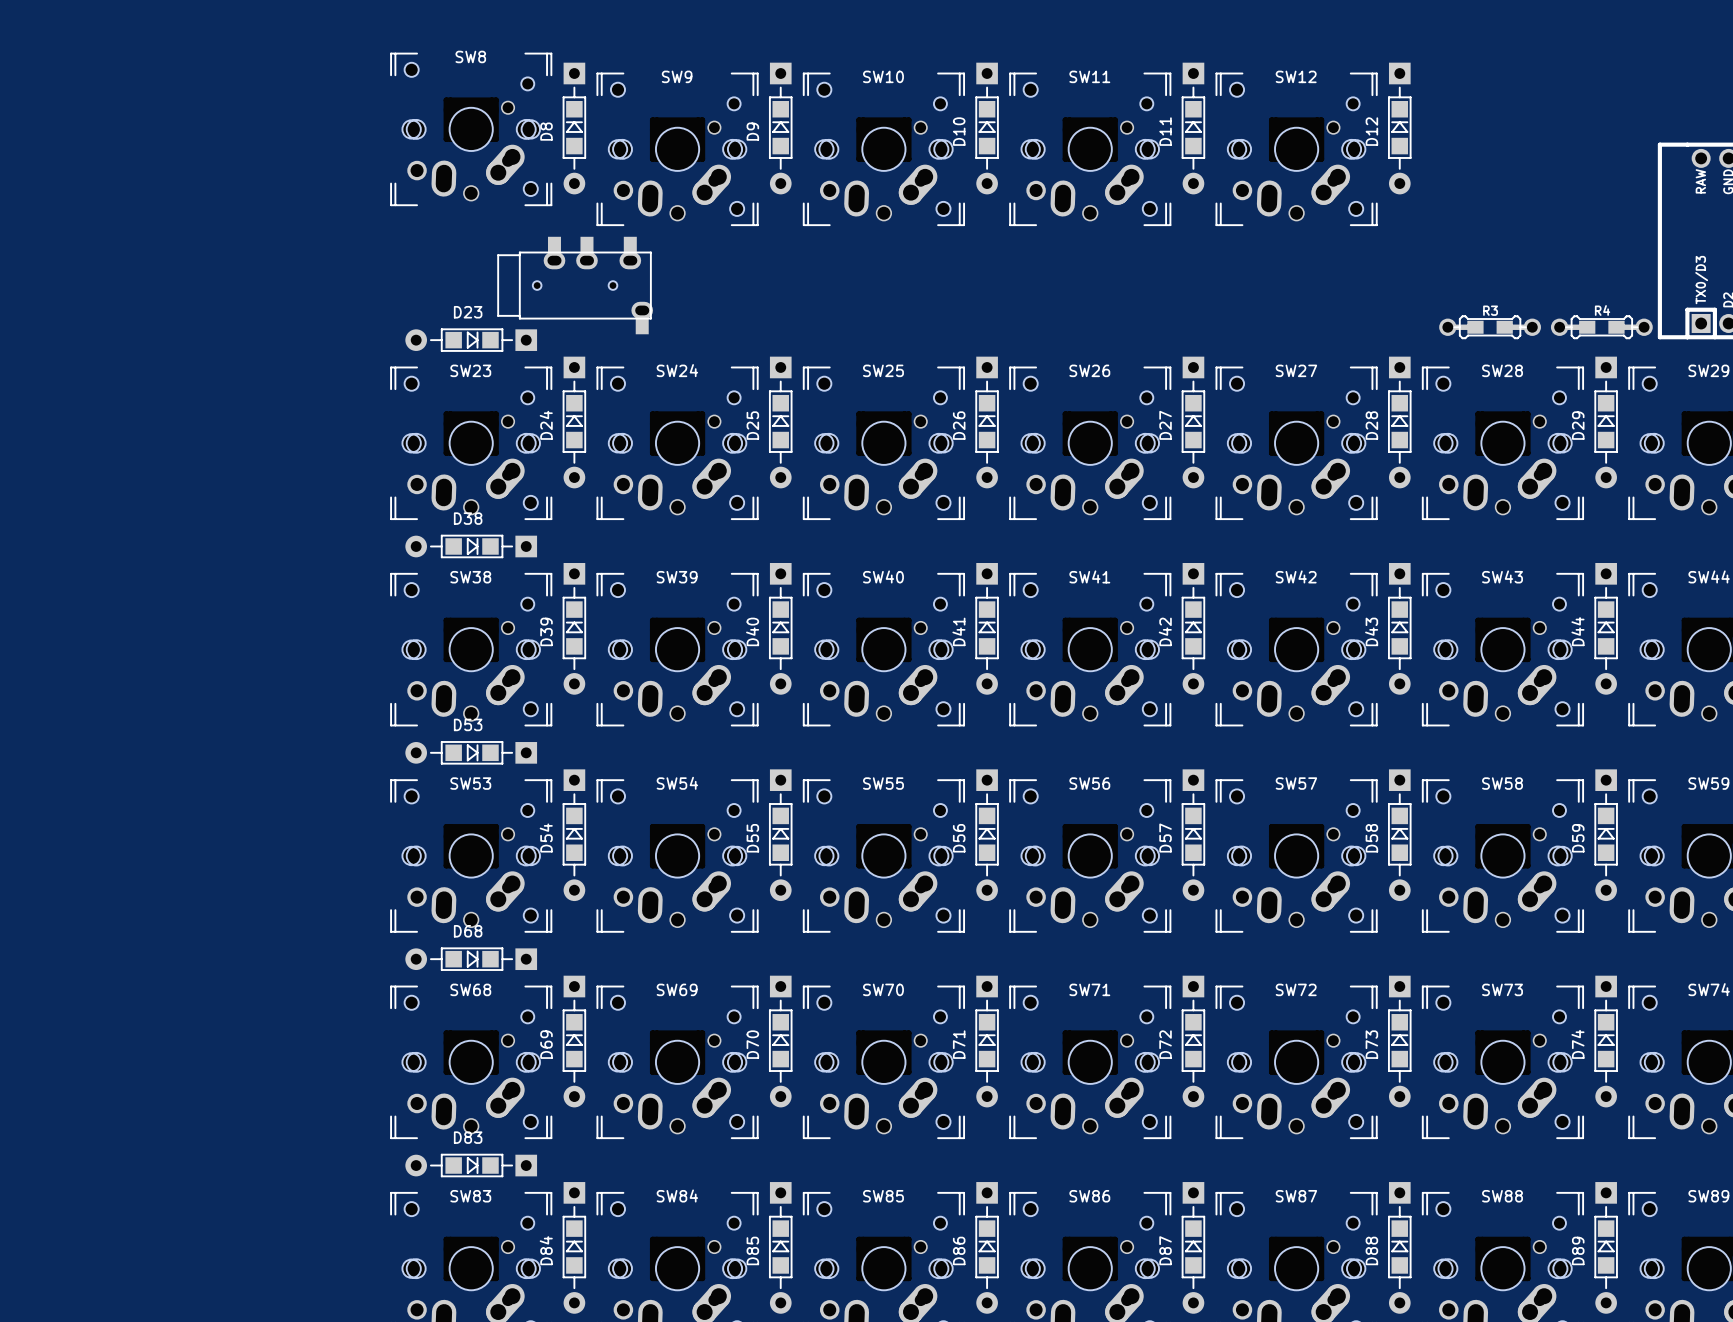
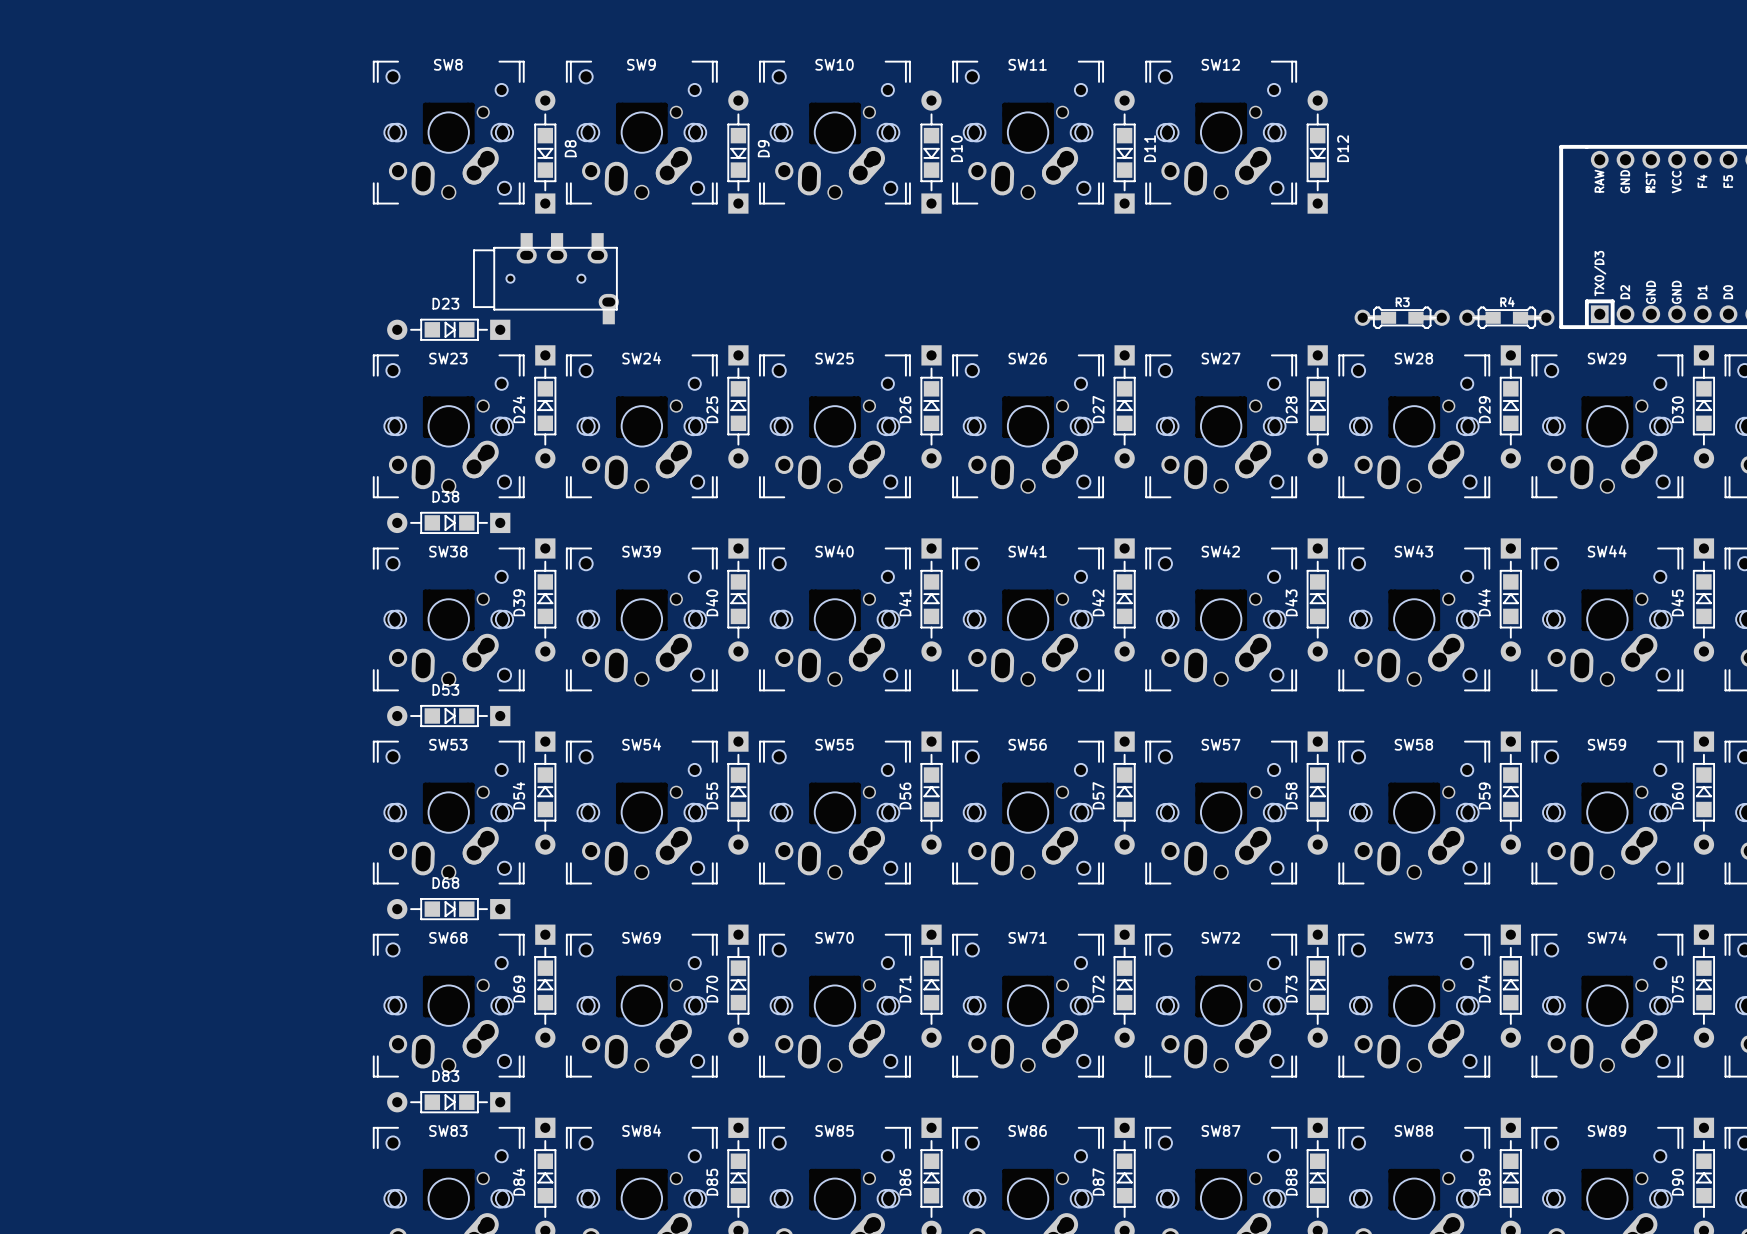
SW9 footprint: [596, 72, 759, 226] -> [566, 60, 718, 205]
SW10 footprint: [802, 72, 965, 226] -> [759, 60, 911, 205]
SW11 footprint: [1009, 72, 1172, 226] -> [952, 60, 1104, 205]
SW12 footprint: [1215, 72, 1378, 226] -> [1145, 60, 1297, 205]
D8 rotation: 0° (574, 128) -> 180° (545, 152)
D9 rotation: 0° (780, 128) -> 180° (738, 152)
D10 rotation: 0° (987, 128) -> 180° (931, 152)
D11 rotation: 0° (1193, 128) -> 180° (1124, 152)
D12 rotation: 0° (1399, 128) -> 180° (1317, 152)

